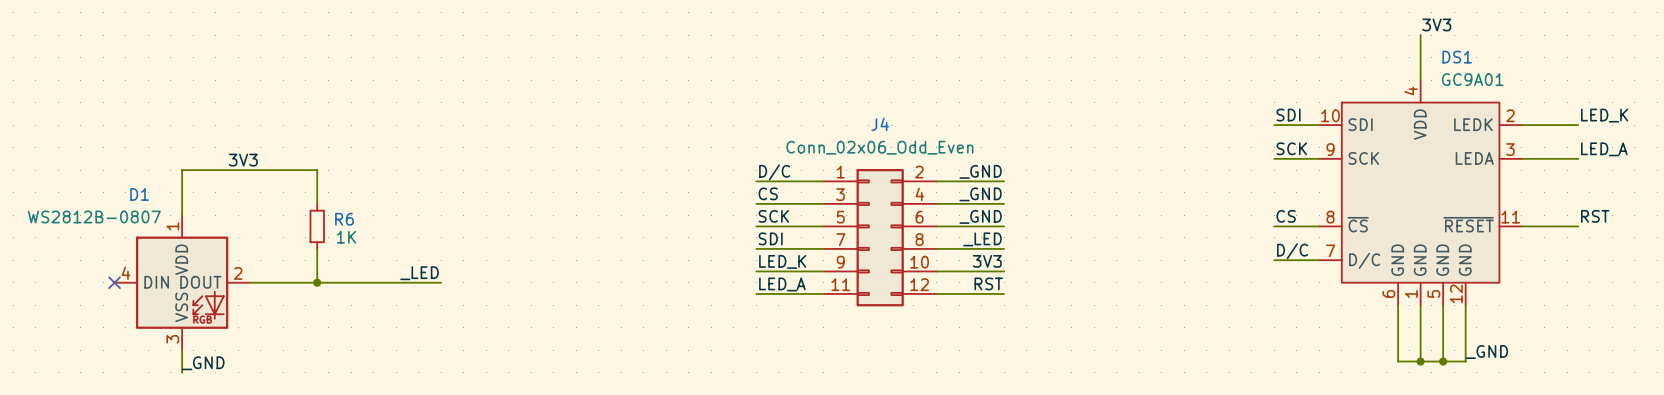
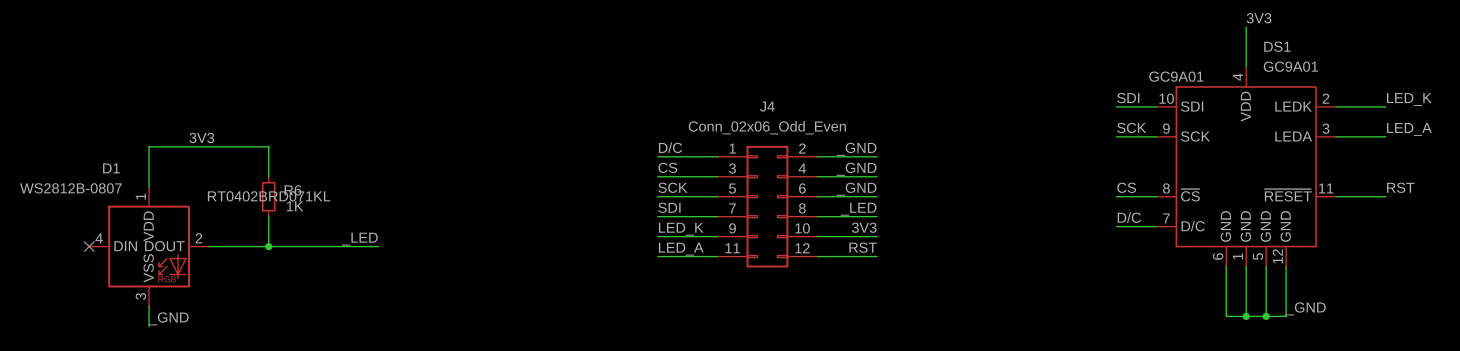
DS1 text: none -> GC9A01 (1176, 76)
R6 text: none -> RT0402BRD071KL (269, 196)

